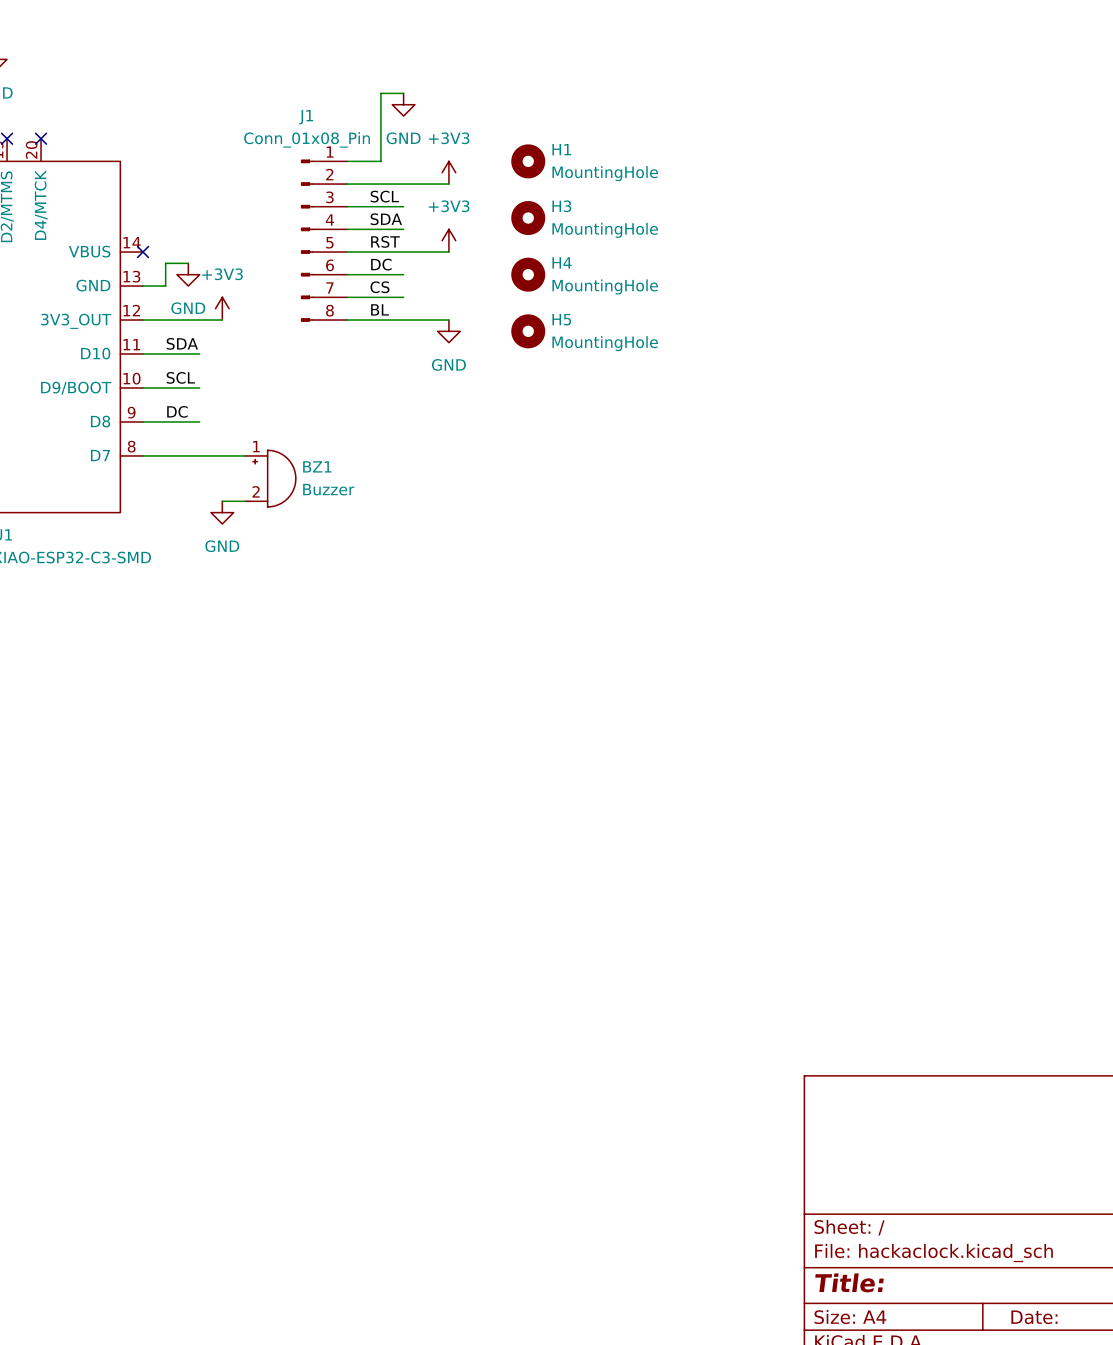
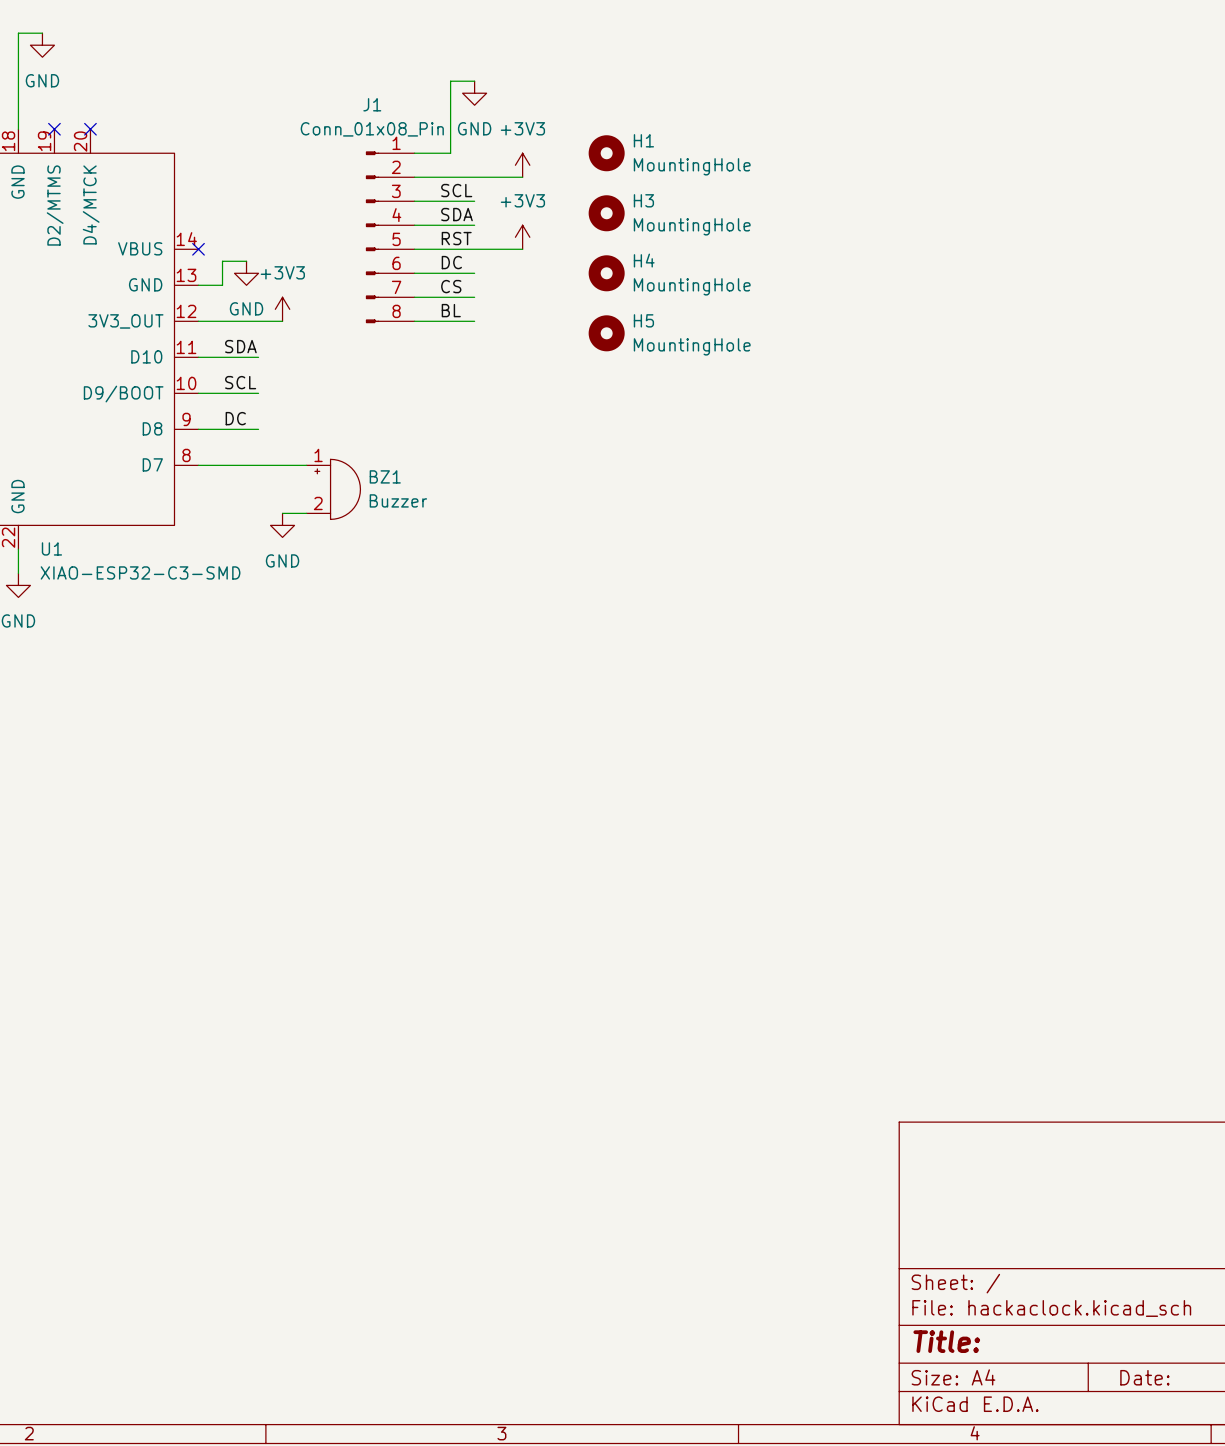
wire: (403, 320) (448, 320) -> none
power symbol: GND (448, 331) -> none

